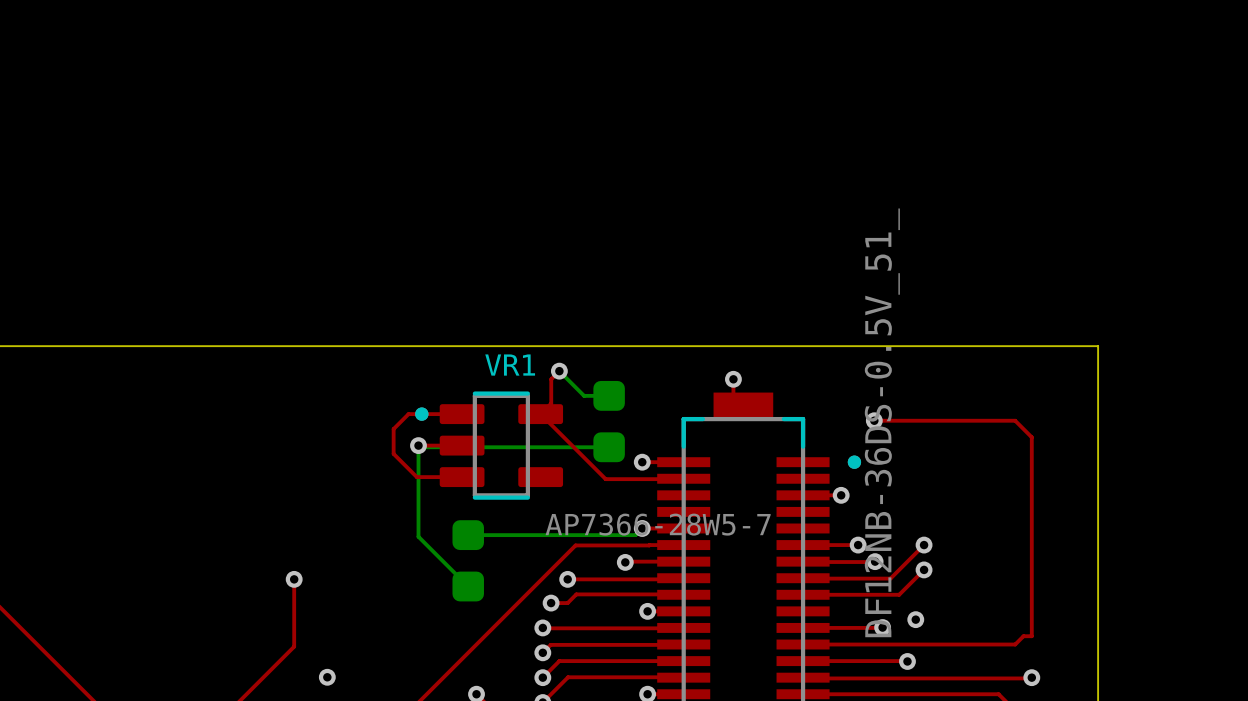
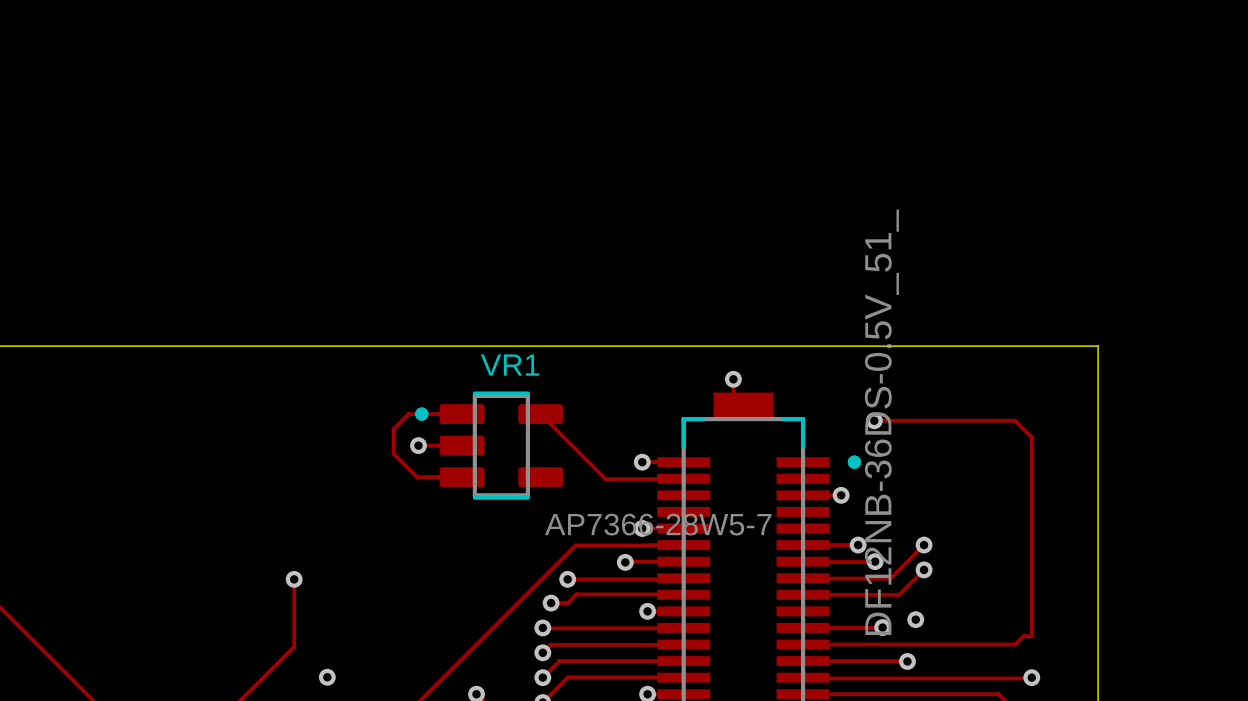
top track: (559, 371) (551, 379) (551, 403) (540, 414) -> none
bottom track: (559, 371) (584, 395) (609, 395) -> none
via: (559, 371) -> none
part: (609, 421) -> none
bottom track: (609, 447) (420, 447) (418, 445) (418, 536) (468, 586) -> none
bottom track: (642, 528) (635, 535) (468, 535) -> none
part: (468, 560) -> none

